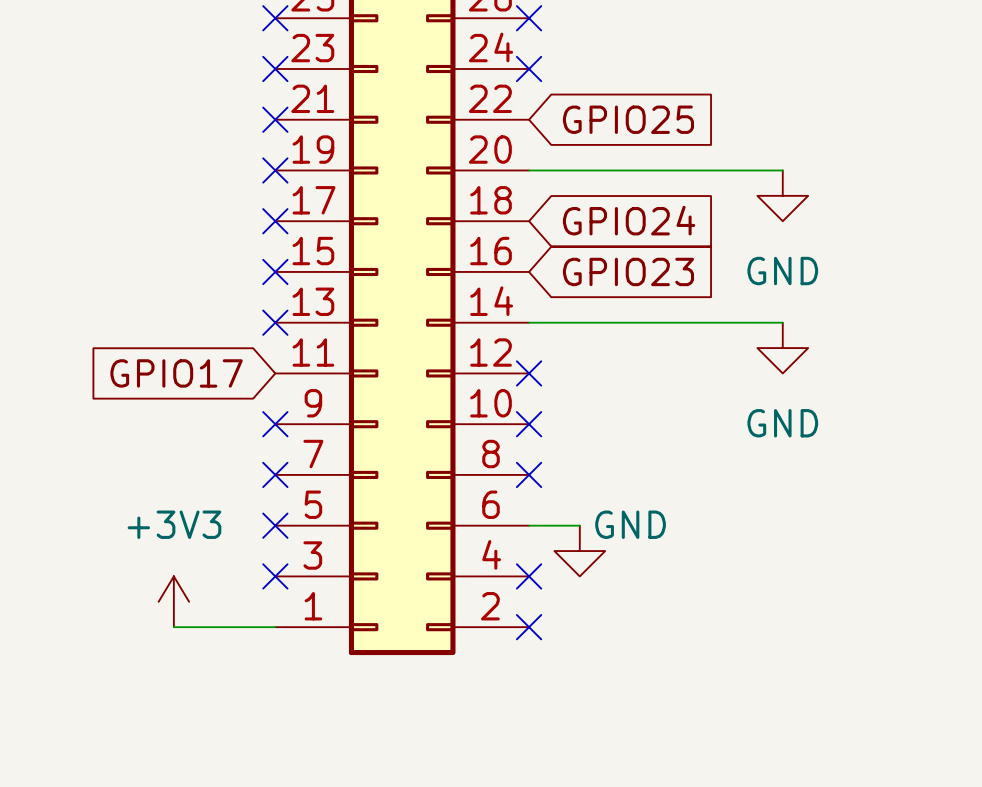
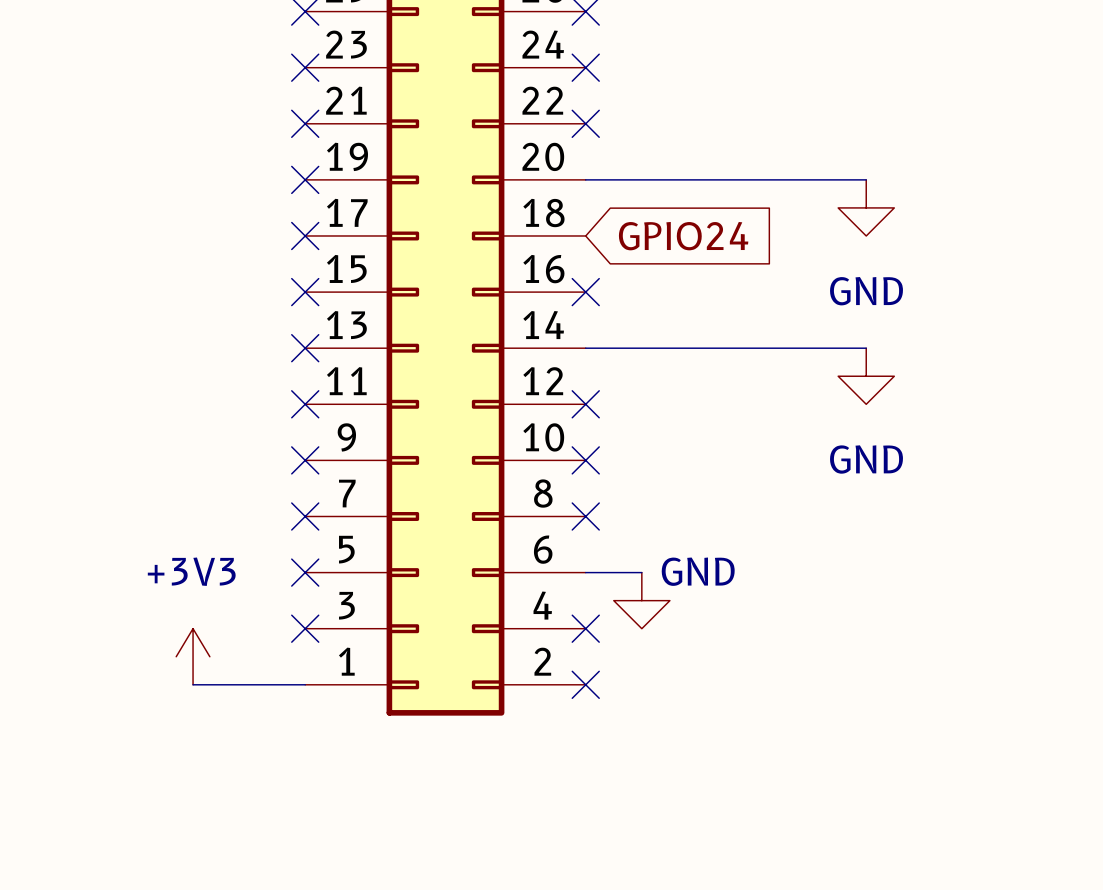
no-connect mark: none -> (585, 123)
global label: GPIO25 (628, 119) -> none
no-connect mark: none -> (585, 292)
global label: GPIO23 (628, 271) -> none
global label: GPIO17 (176, 373) -> none
no-connect mark: none -> (305, 404)

